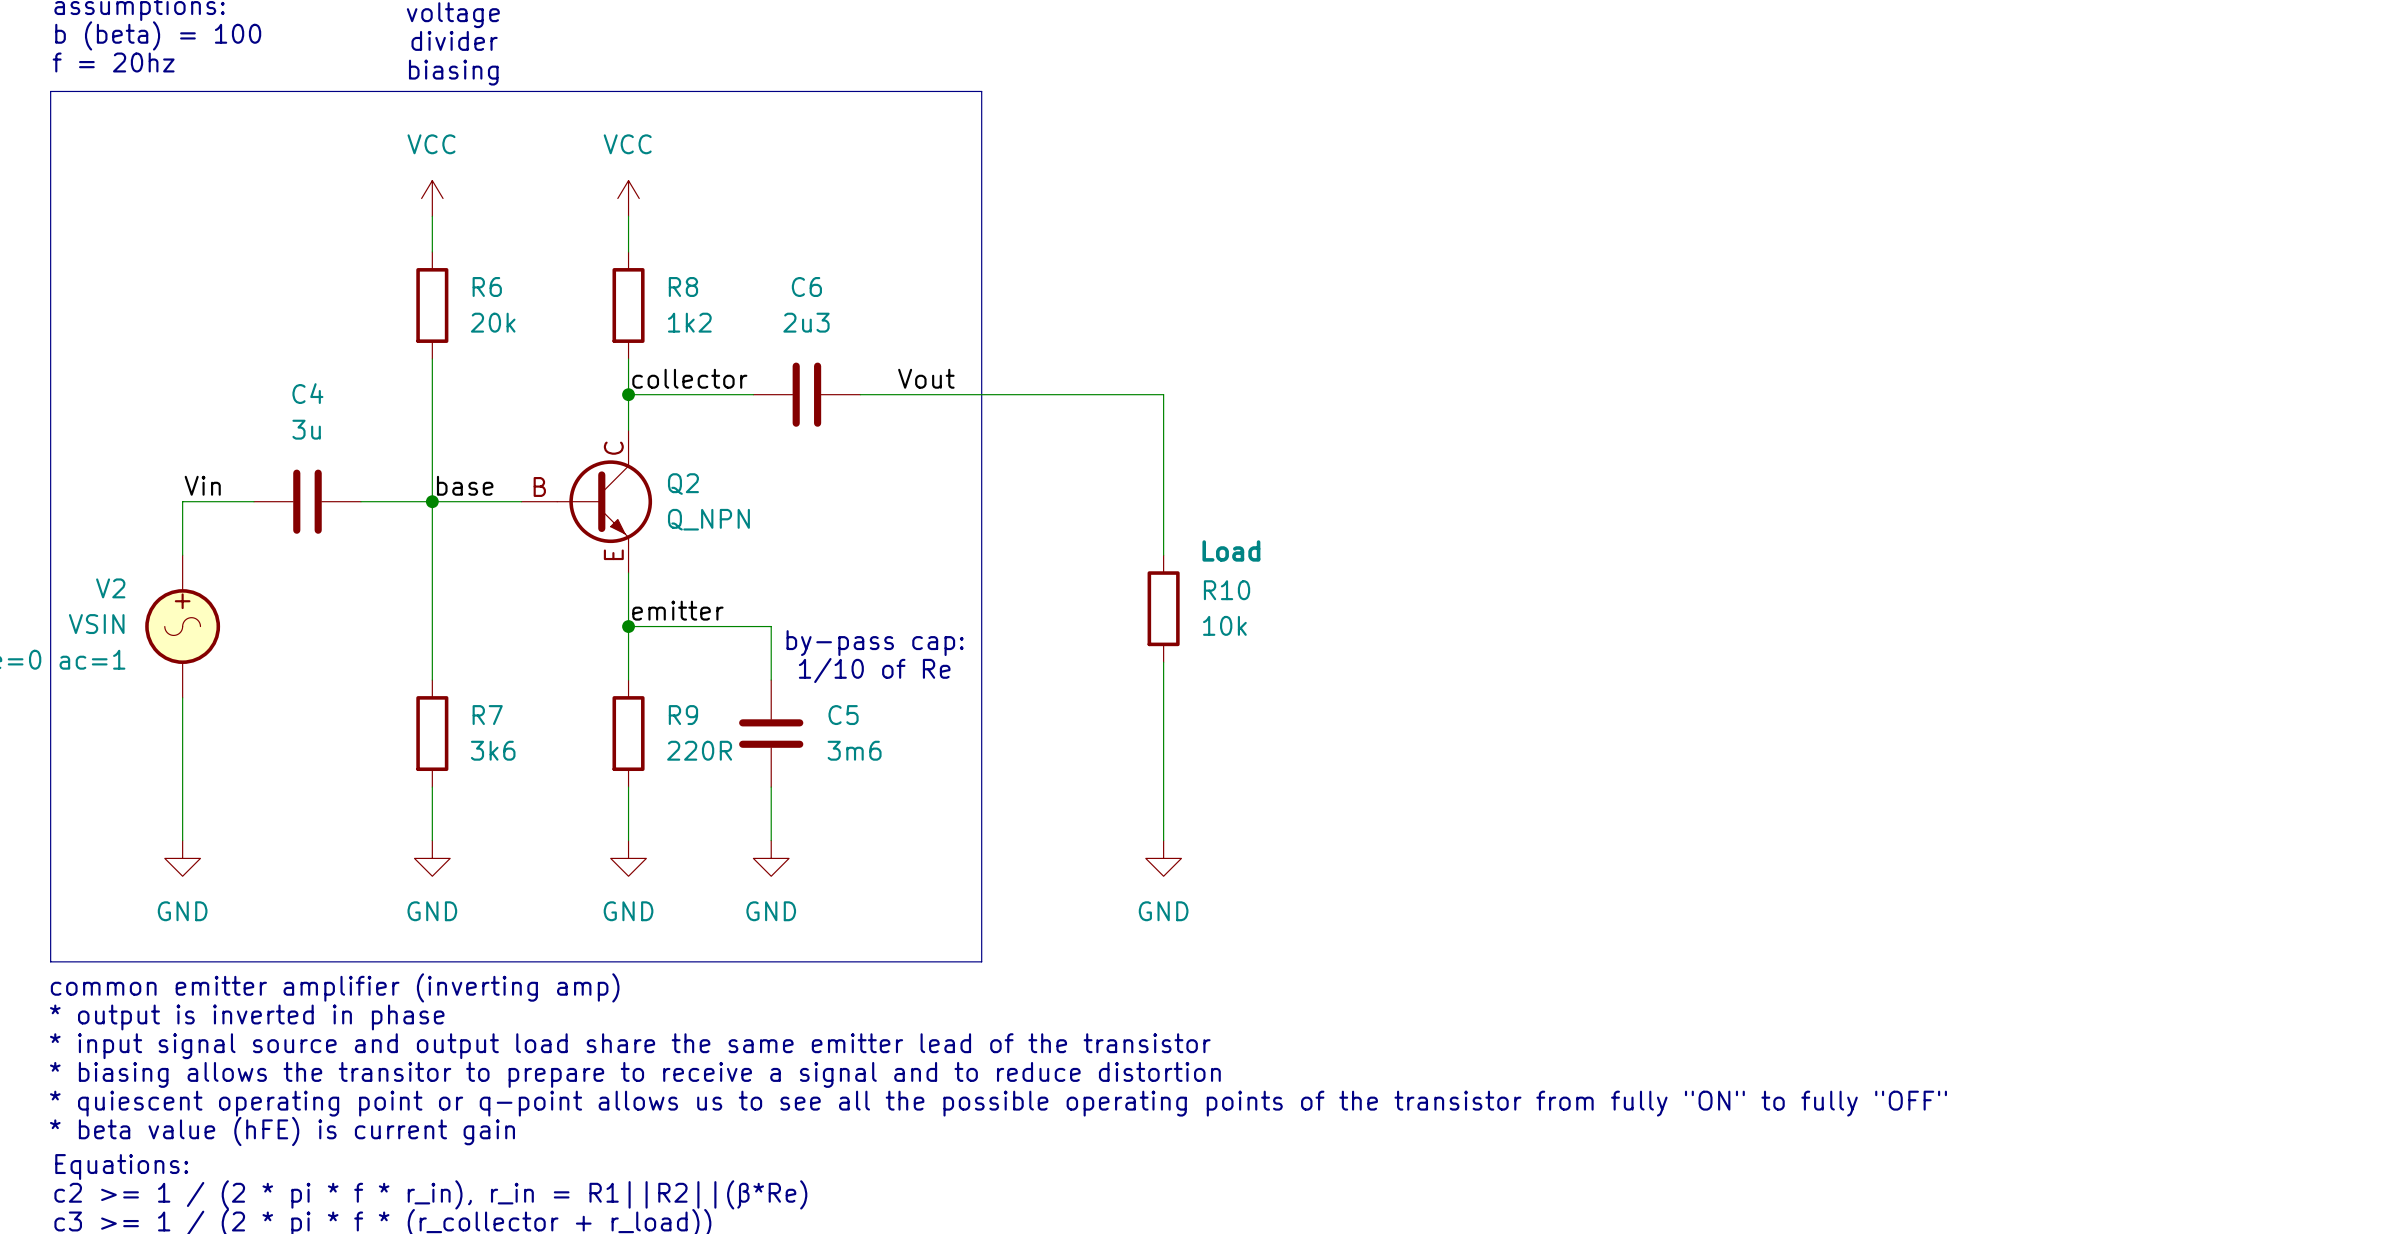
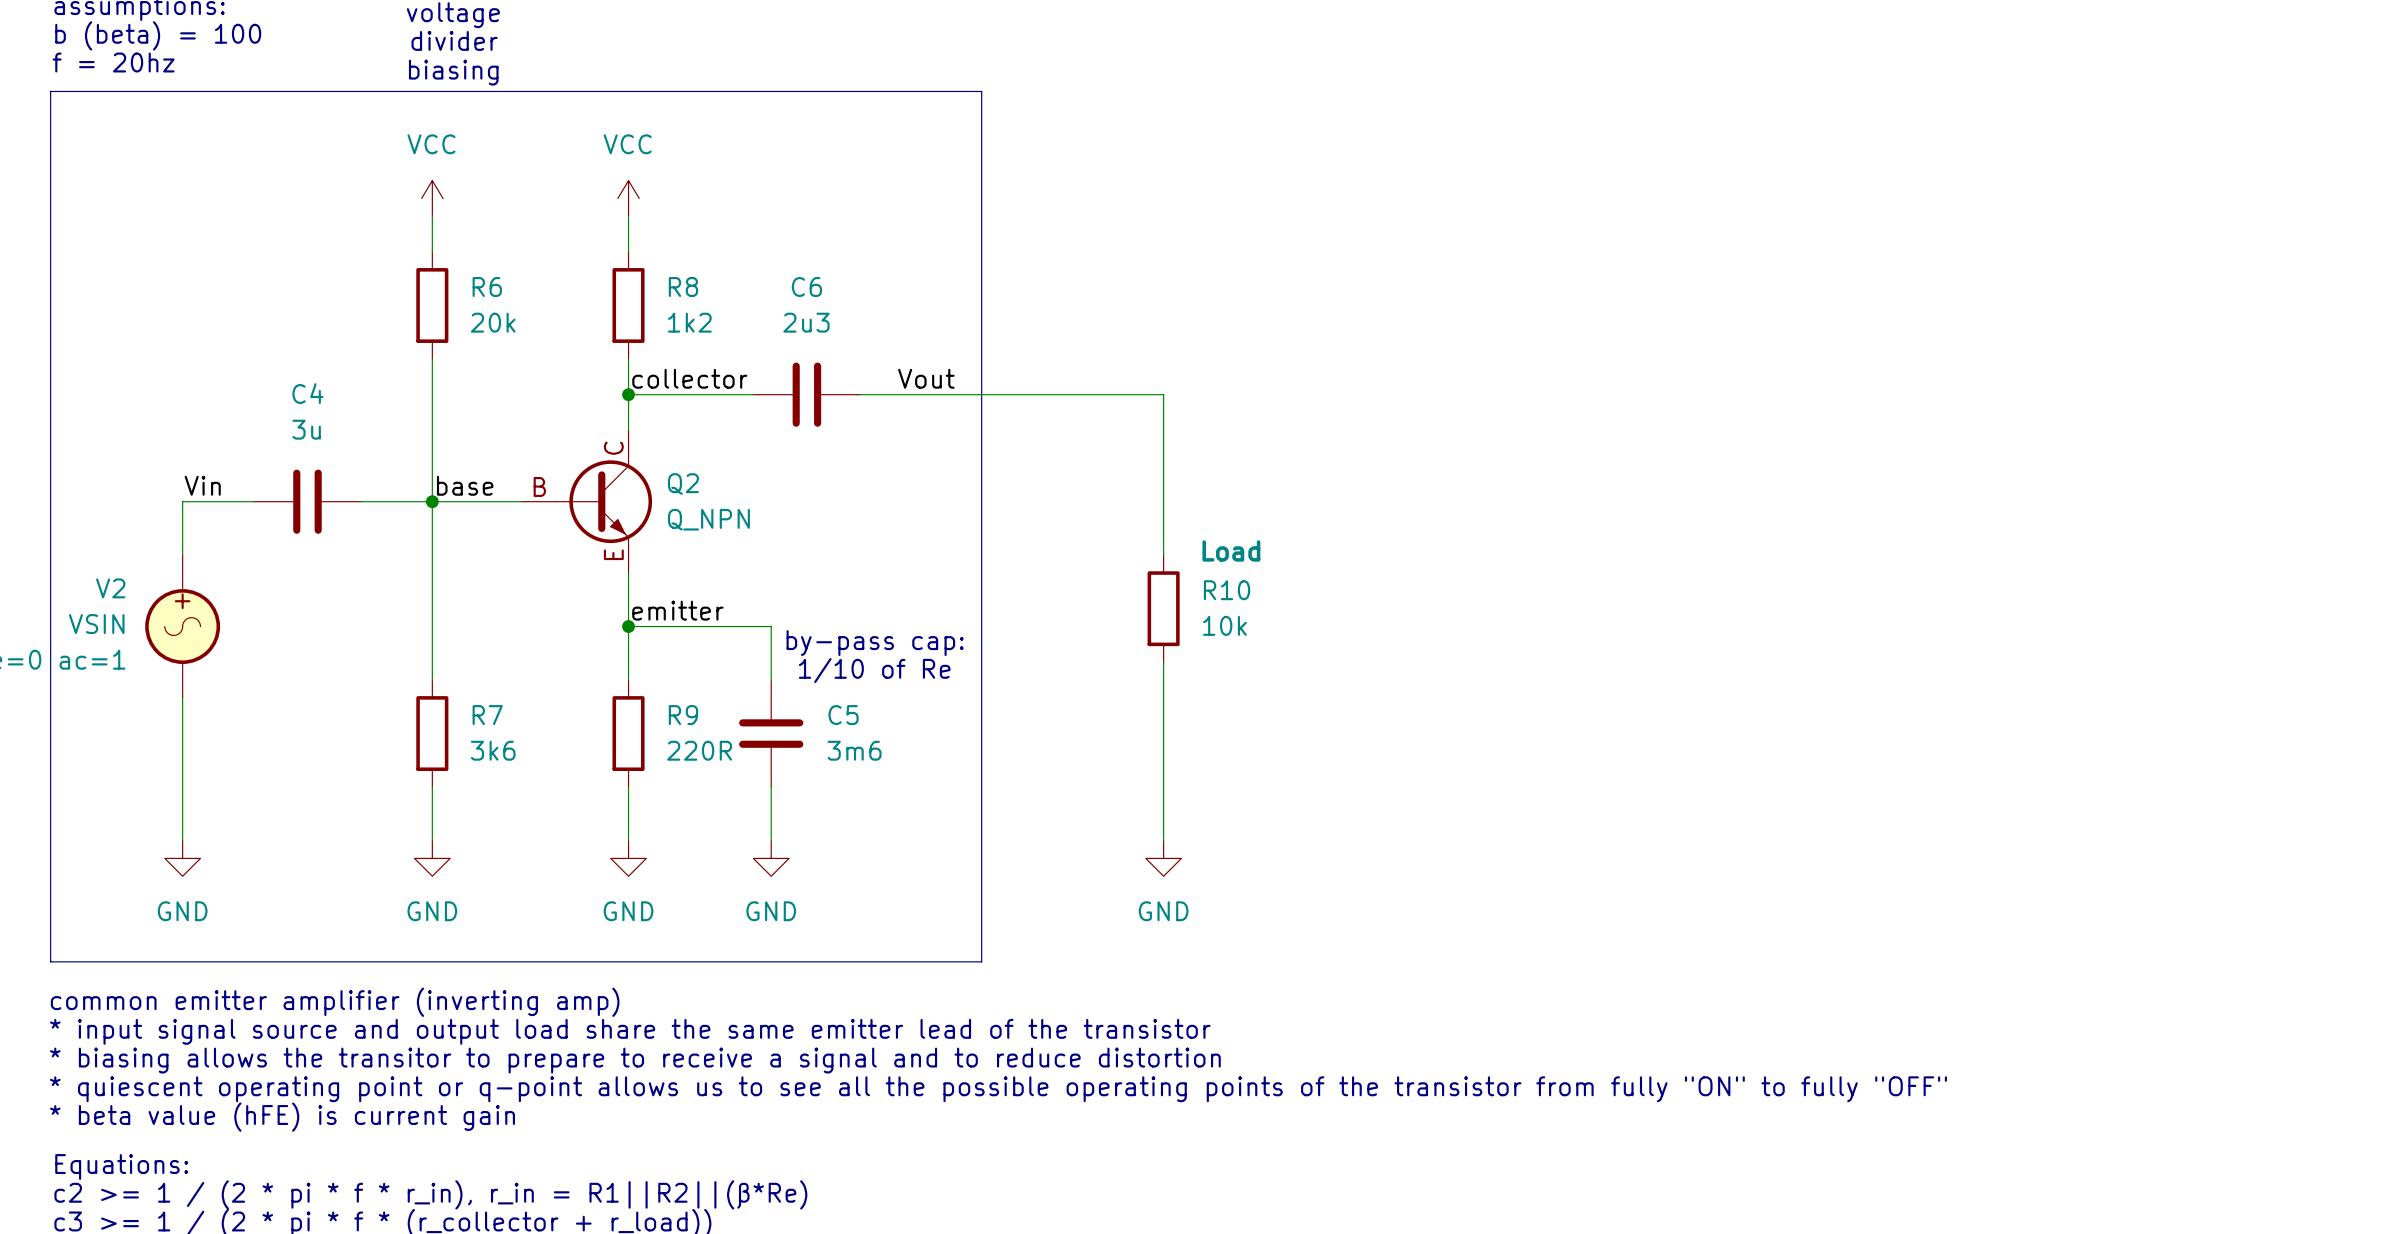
text position: common emitter amplifier (inverting amp) (335, 987) -> common emitter amplifier (inverting amp) (335, 1002)
text: * output is inverted in phase (247, 1017) -> none
text position: * input signal source and output load share the same emitter lead of the transistor (630, 1046) -> * input signal source and output load share the same emitter lead of the transistor (630, 1031)
text position: * biasing allows the transitor to prepare to receive a signal and to reduce distortion (635, 1074) -> * biasing allows the transitor to prepare to receive a signal and to reduce distortion (635, 1060)
text position: * quiescent operating point or q-point allows us to see all the possible operating points of the transistor from fully "ON" to fully "OFF" (998, 1103) -> * quiescent operating point or q-point allows us to see all the possible operating points of the transistor from fully "ON" to fully "OFF" (998, 1089)
text position: * beta value (hFE) is current gain (282, 1131) -> * beta value (hFE) is current gain (282, 1117)

